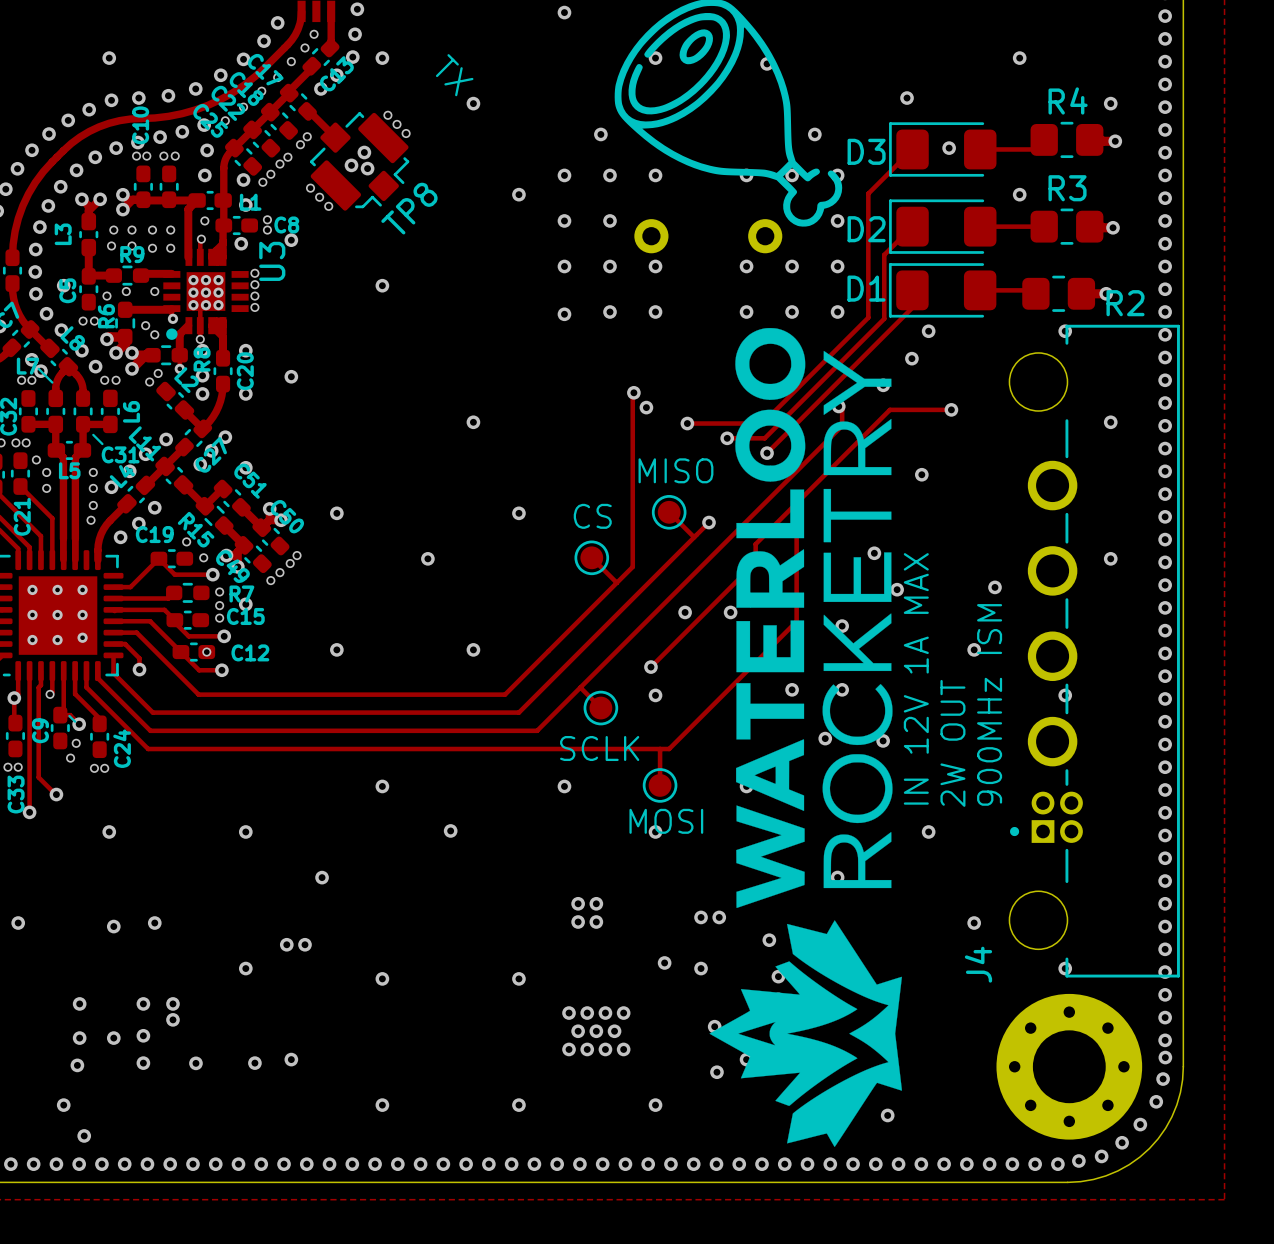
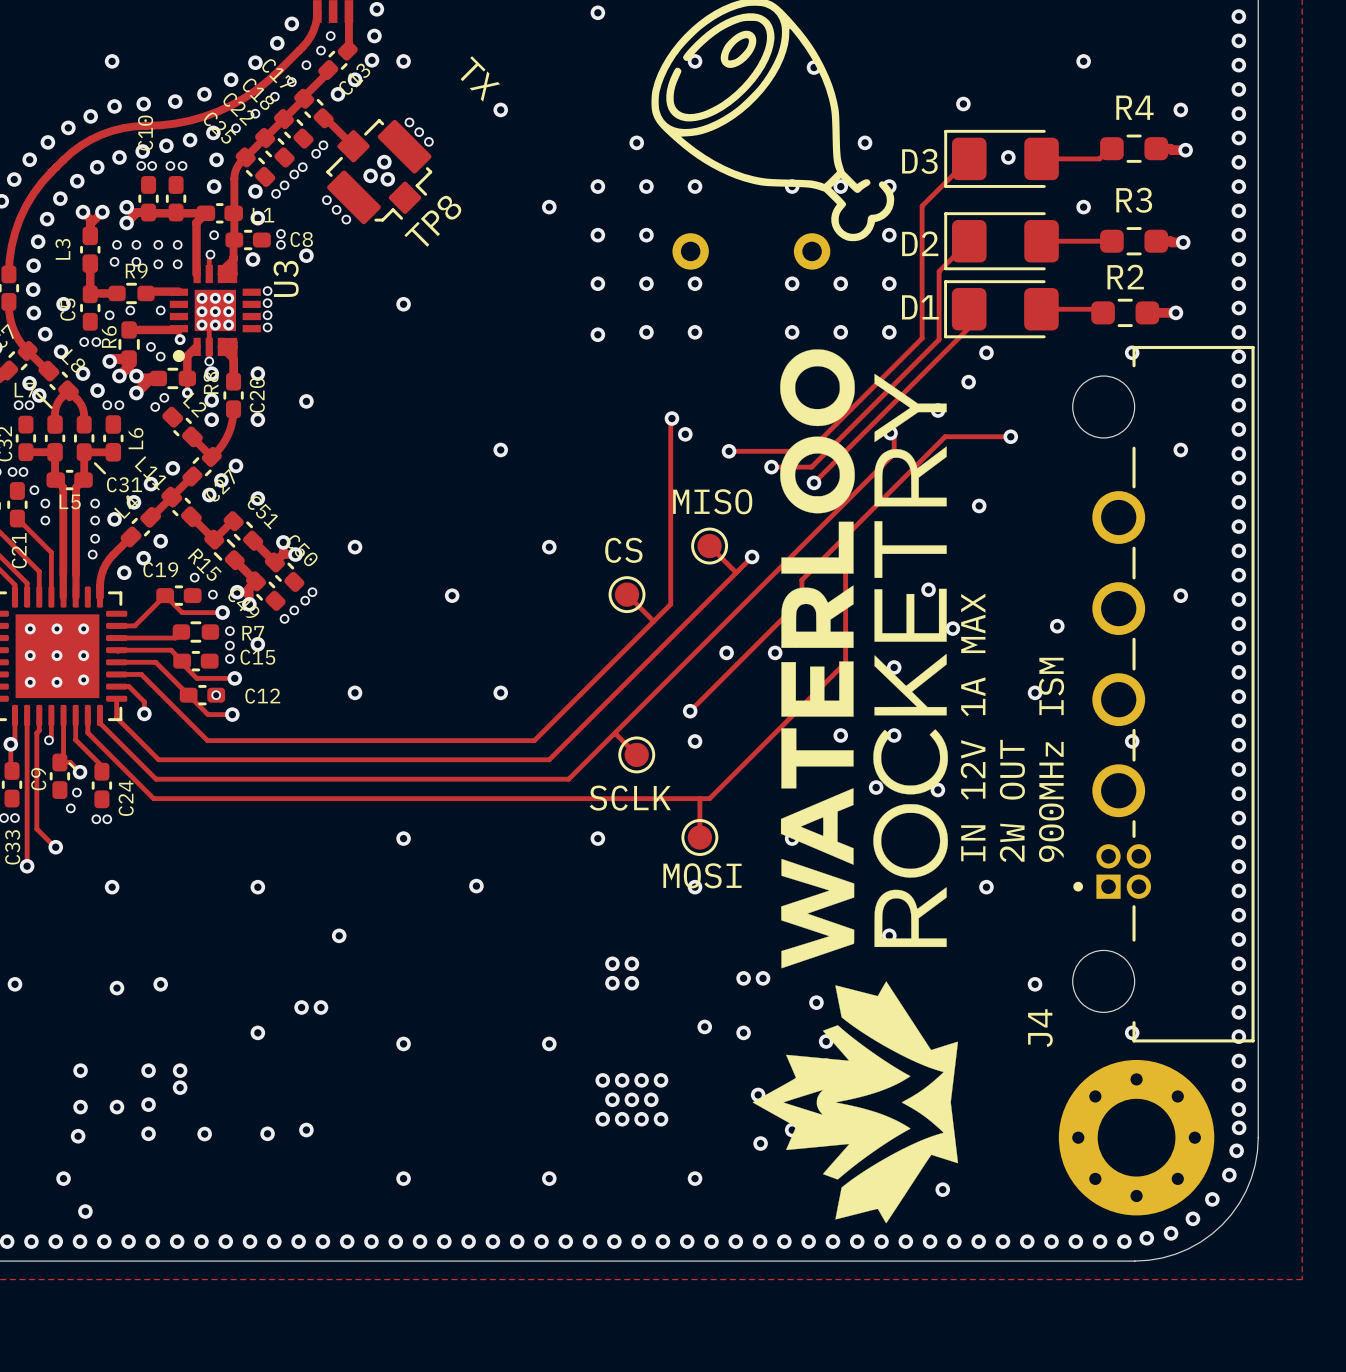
R4 footprint: [1030, 121, 1104, 159] -> [1100, 134, 1169, 163]
R3 footprint: [1030, 208, 1104, 245] -> [1100, 227, 1169, 256]
R2 footprint: [1022, 275, 1096, 312] -> [1091, 298, 1160, 328]
R2 name position: R2 (1125, 303) -> R2 (1125, 277)

